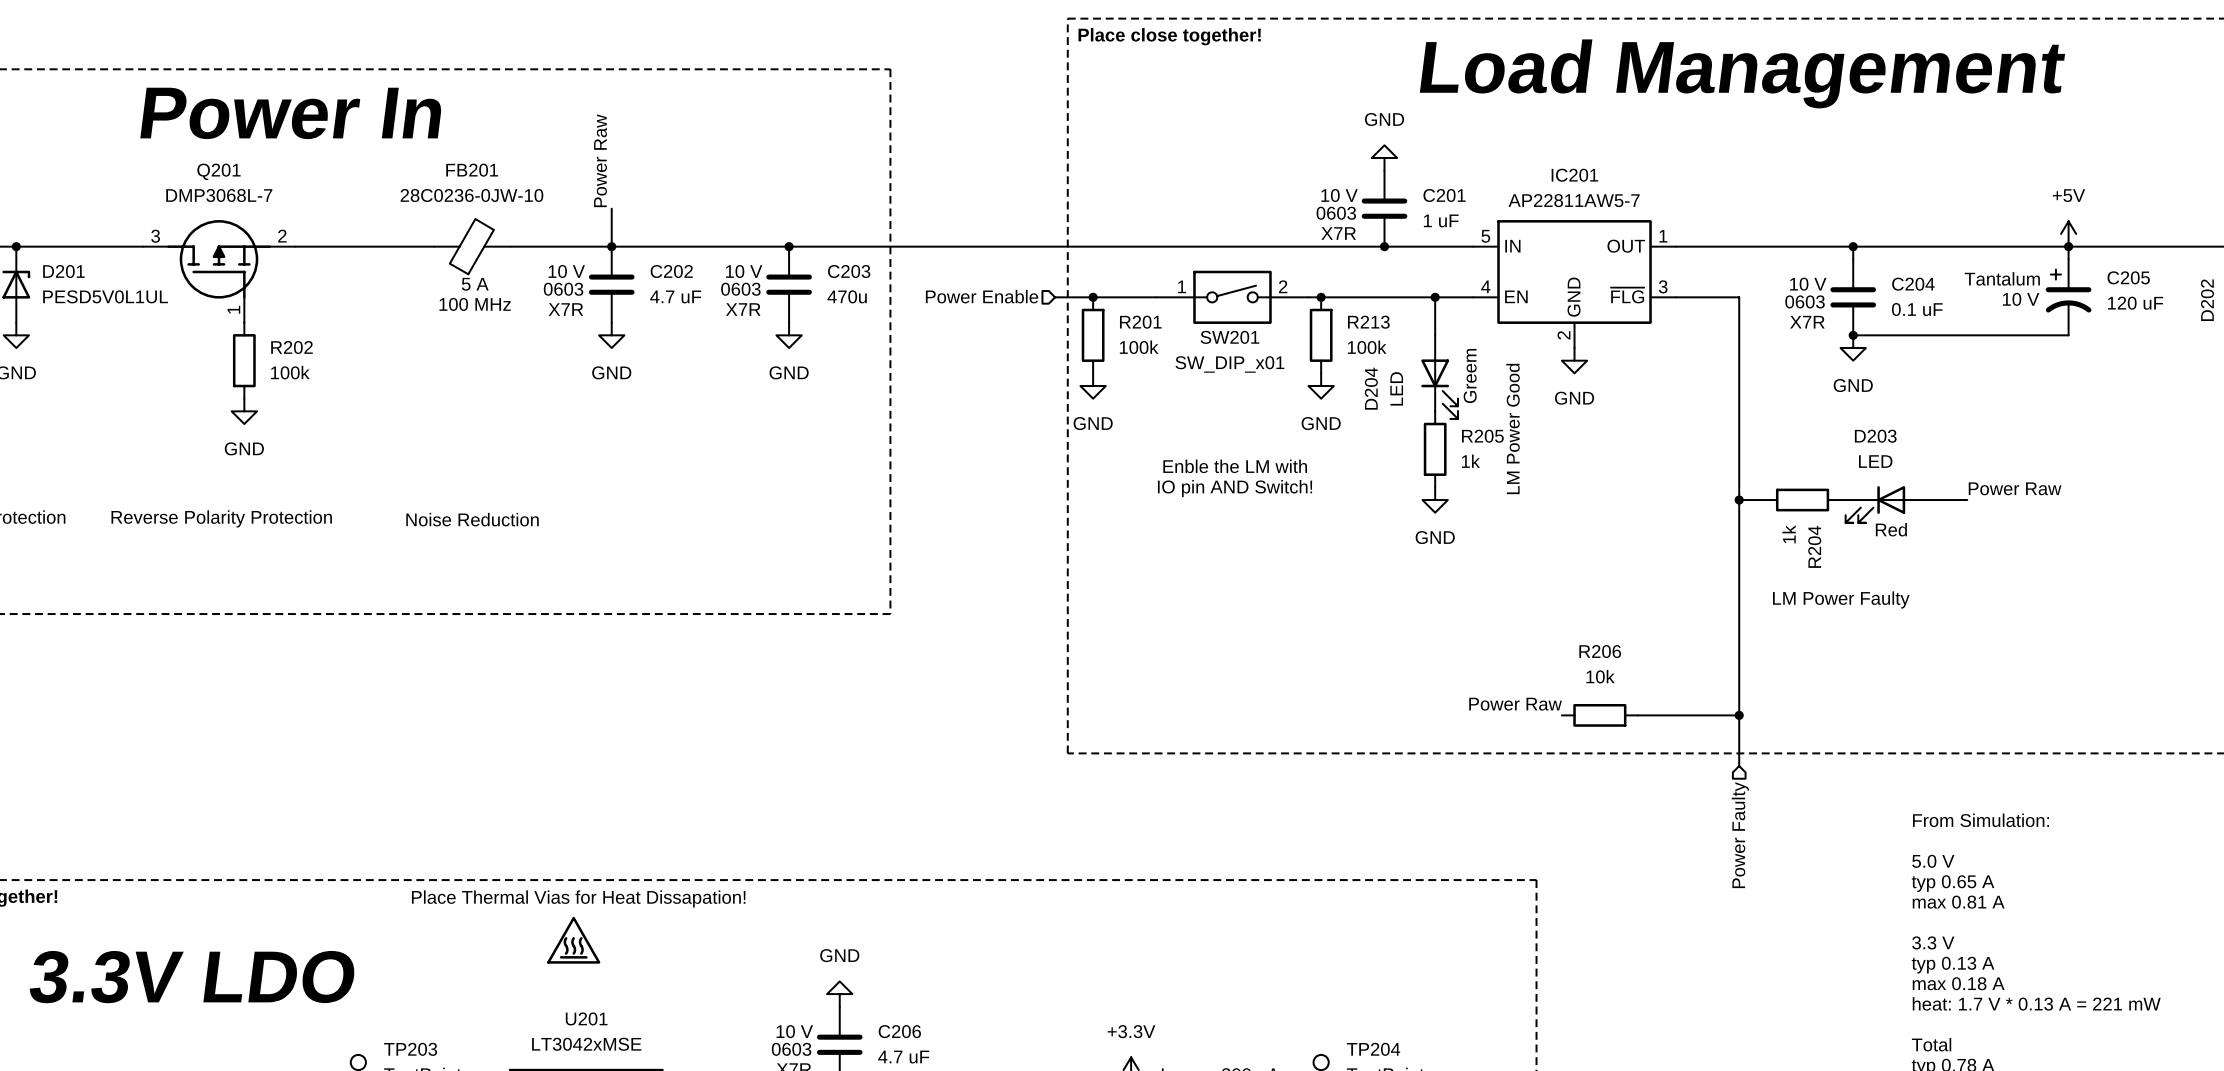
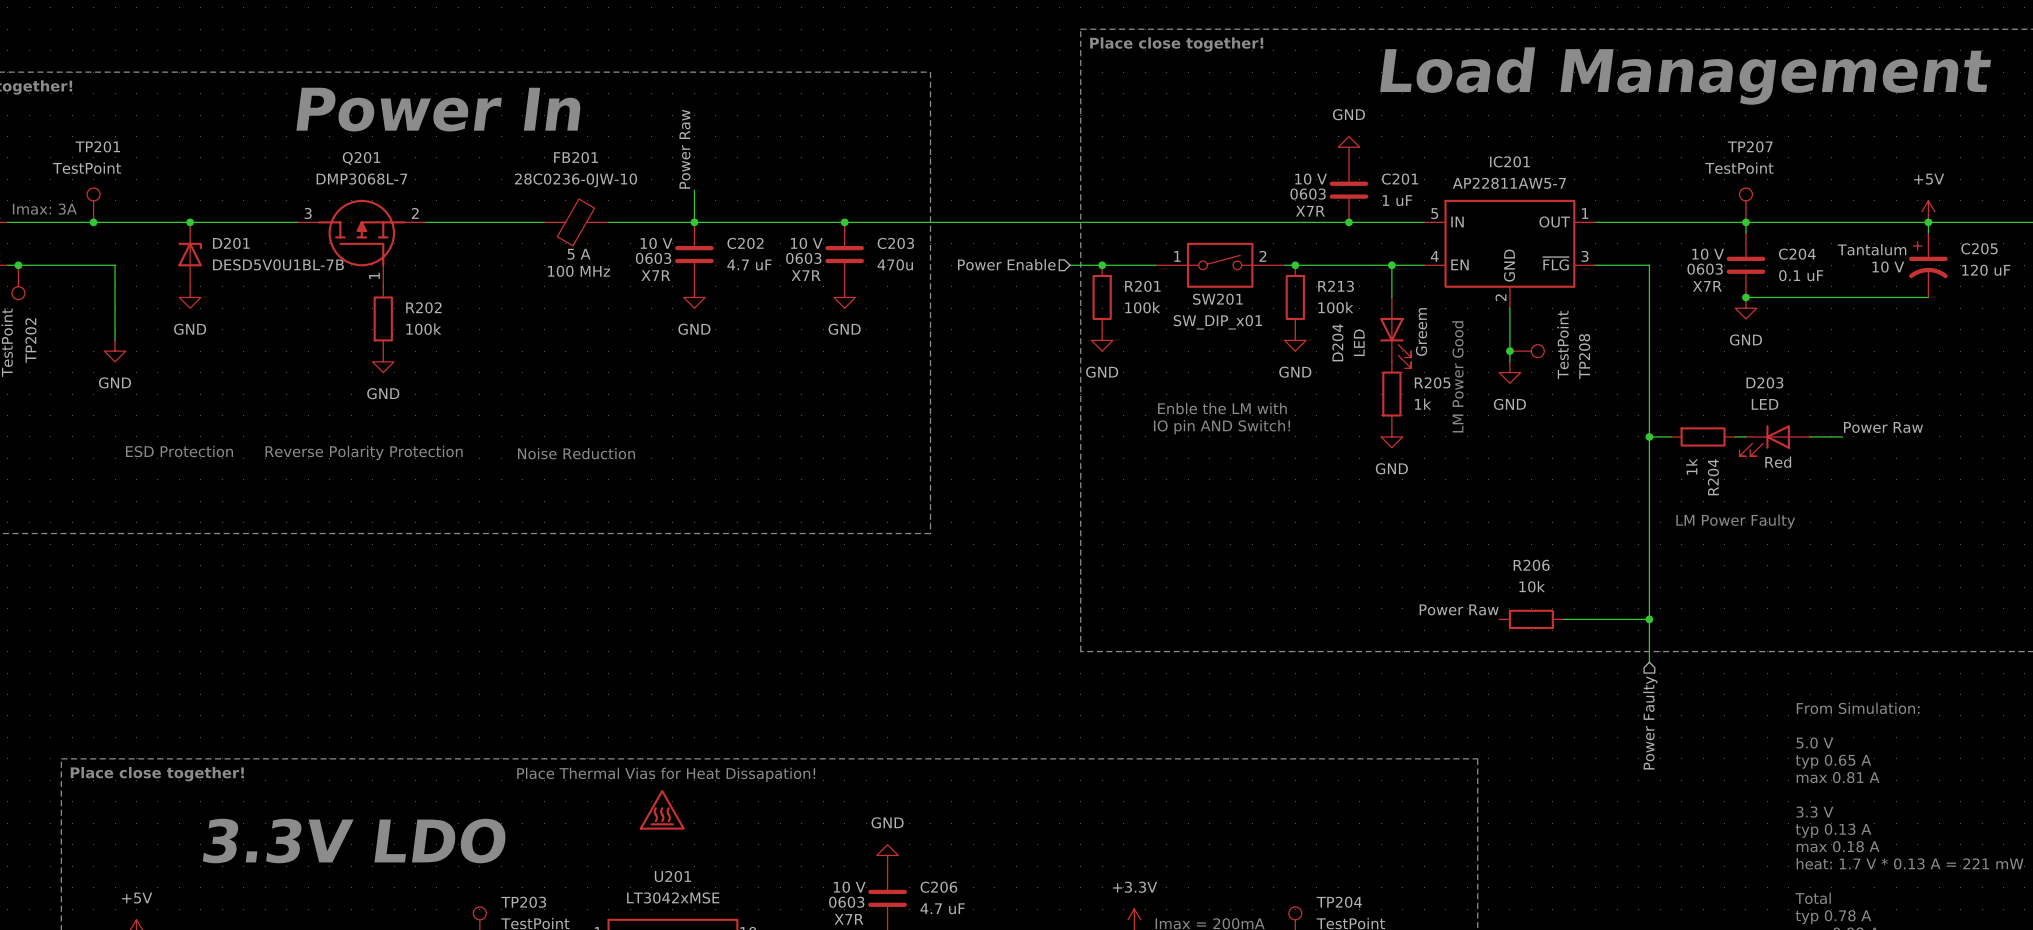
TP207: none -> TestPoint (1745, 205)
D201 value: PESD5V0L1UL (105, 296) -> DESD5V0U1BL-7B (278, 264)
wire: none -> (1509, 308) (1509, 361)
power symbol position: GND (1574, 360) -> GND (1509, 372)
junction: none -> (1509, 351)
TP208: none -> TestPoint (1527, 351)

